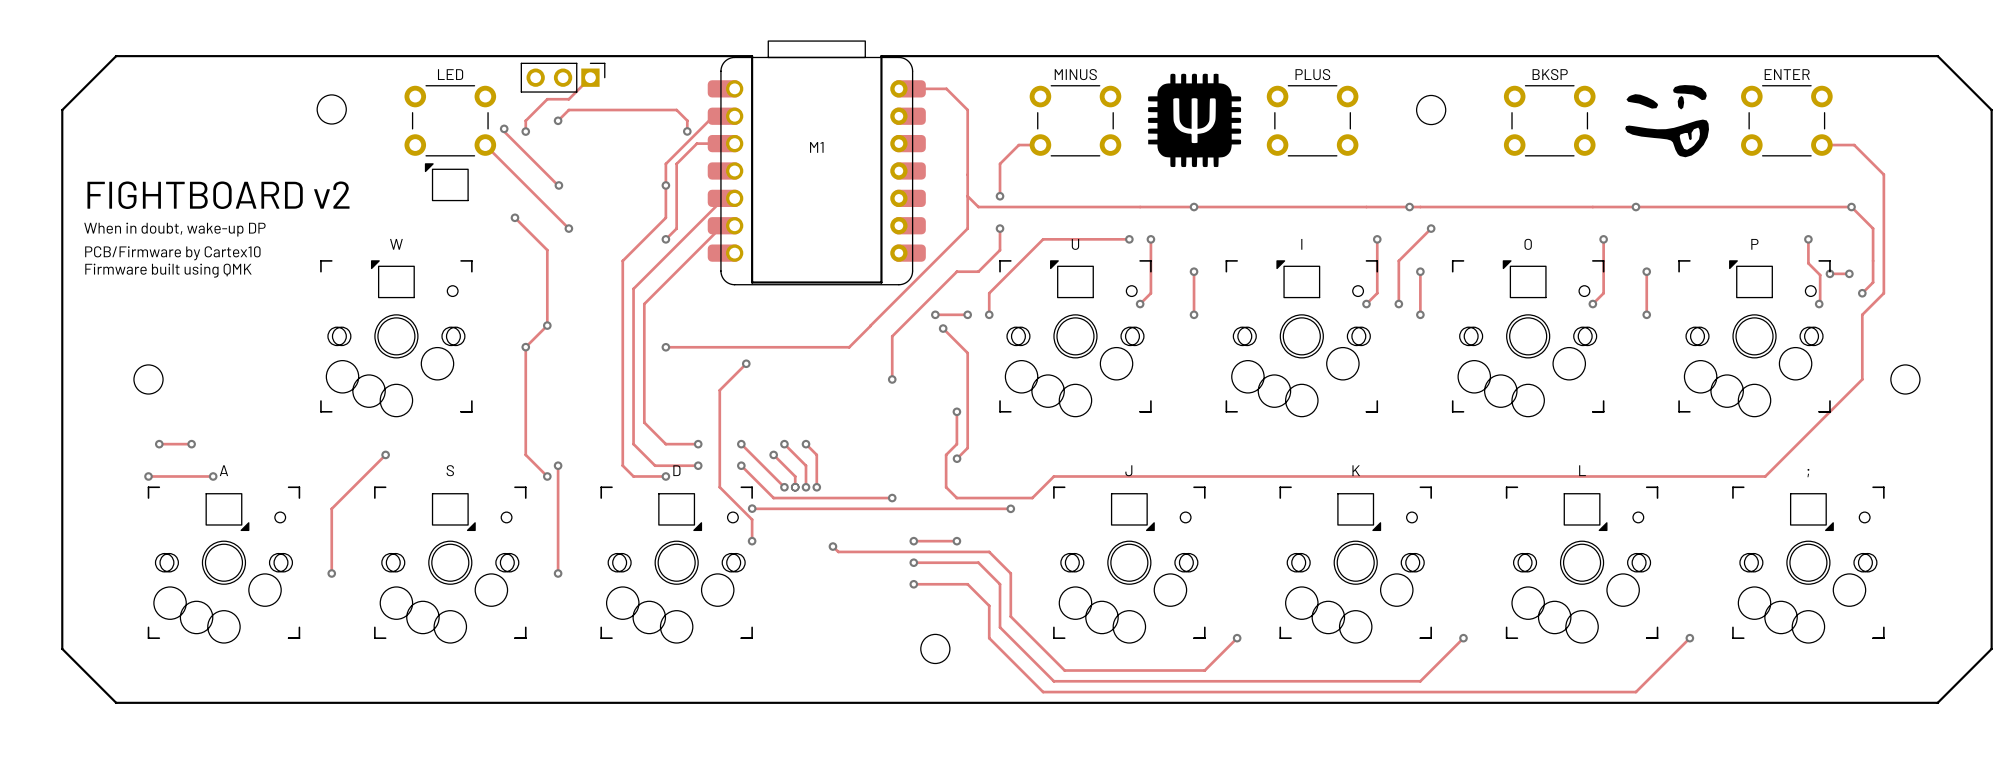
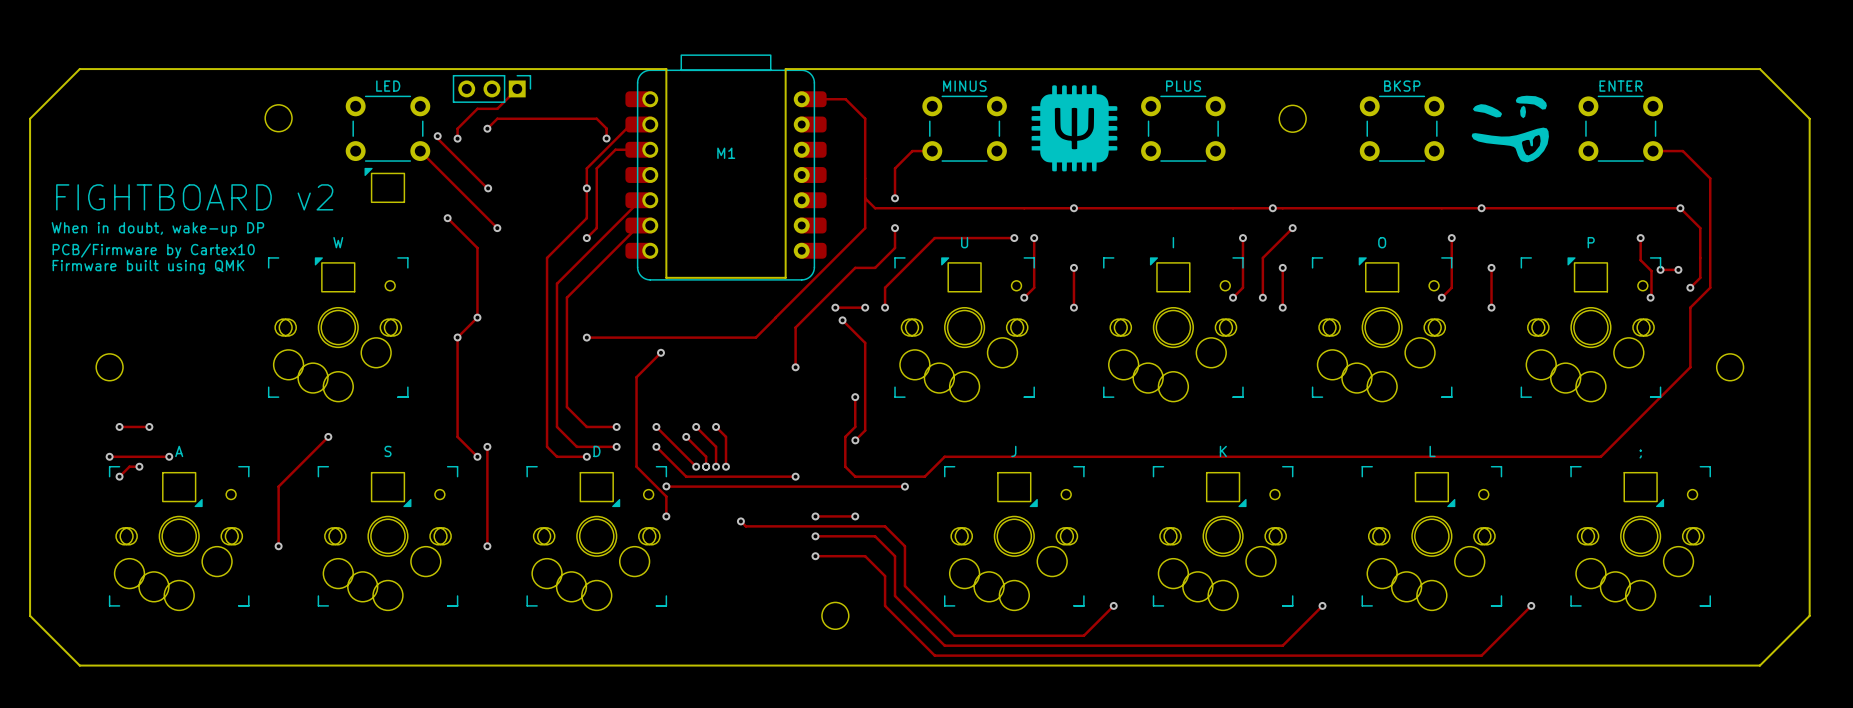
track: none -> (139, 466) (129, 466) (119, 476)
via: none -> (139, 466)
via: none -> (119, 476)

